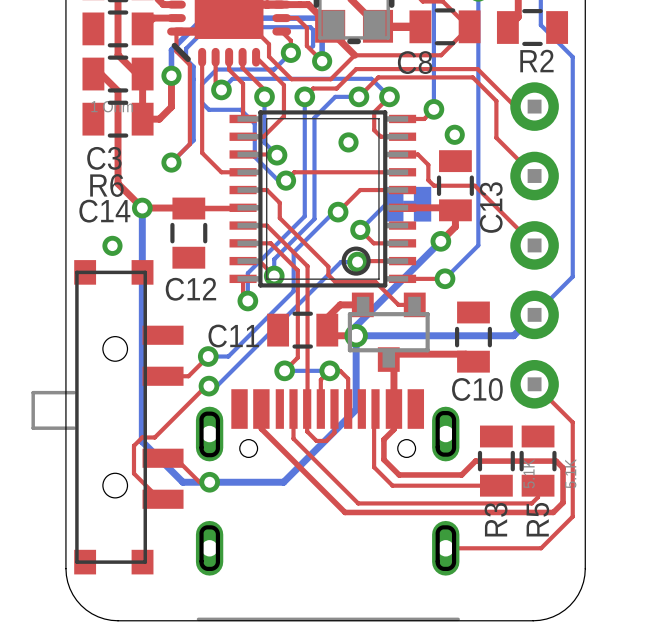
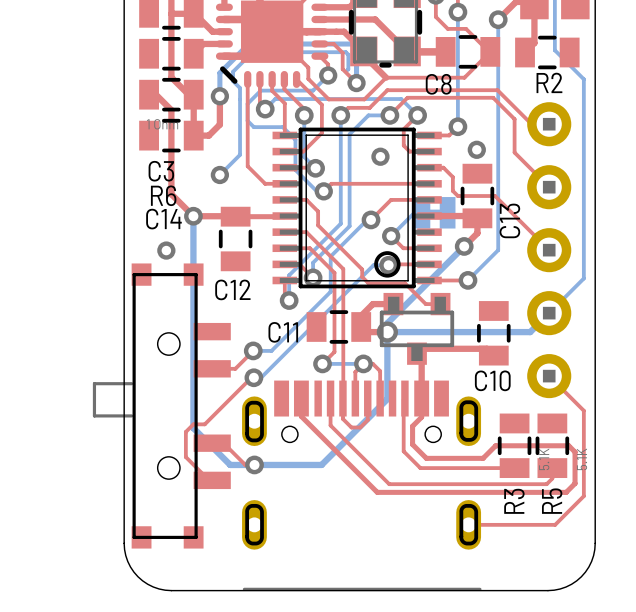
top track: (176, 31) (176, 51) (189, 64) (189, 144) (171, 162) -> none

